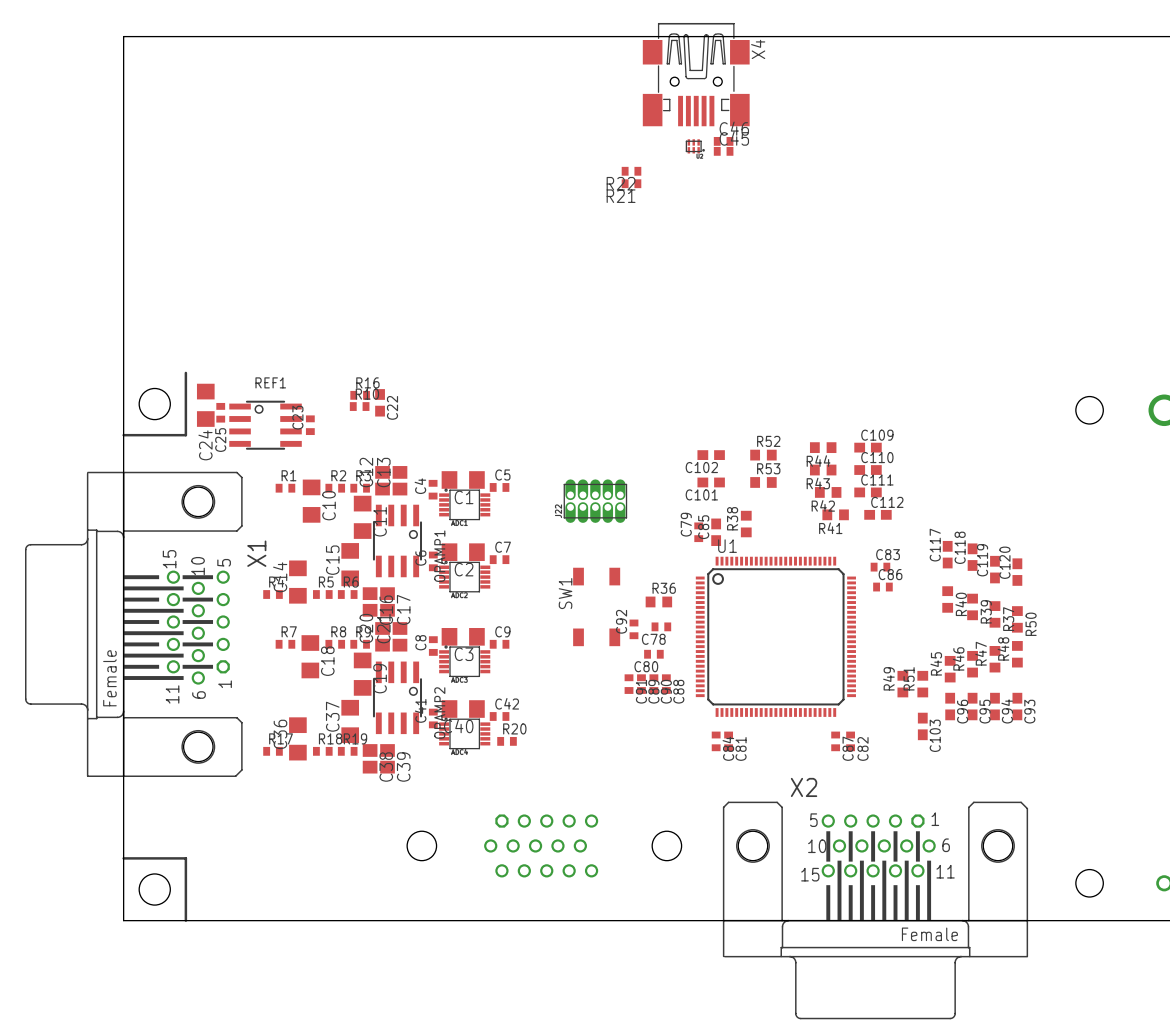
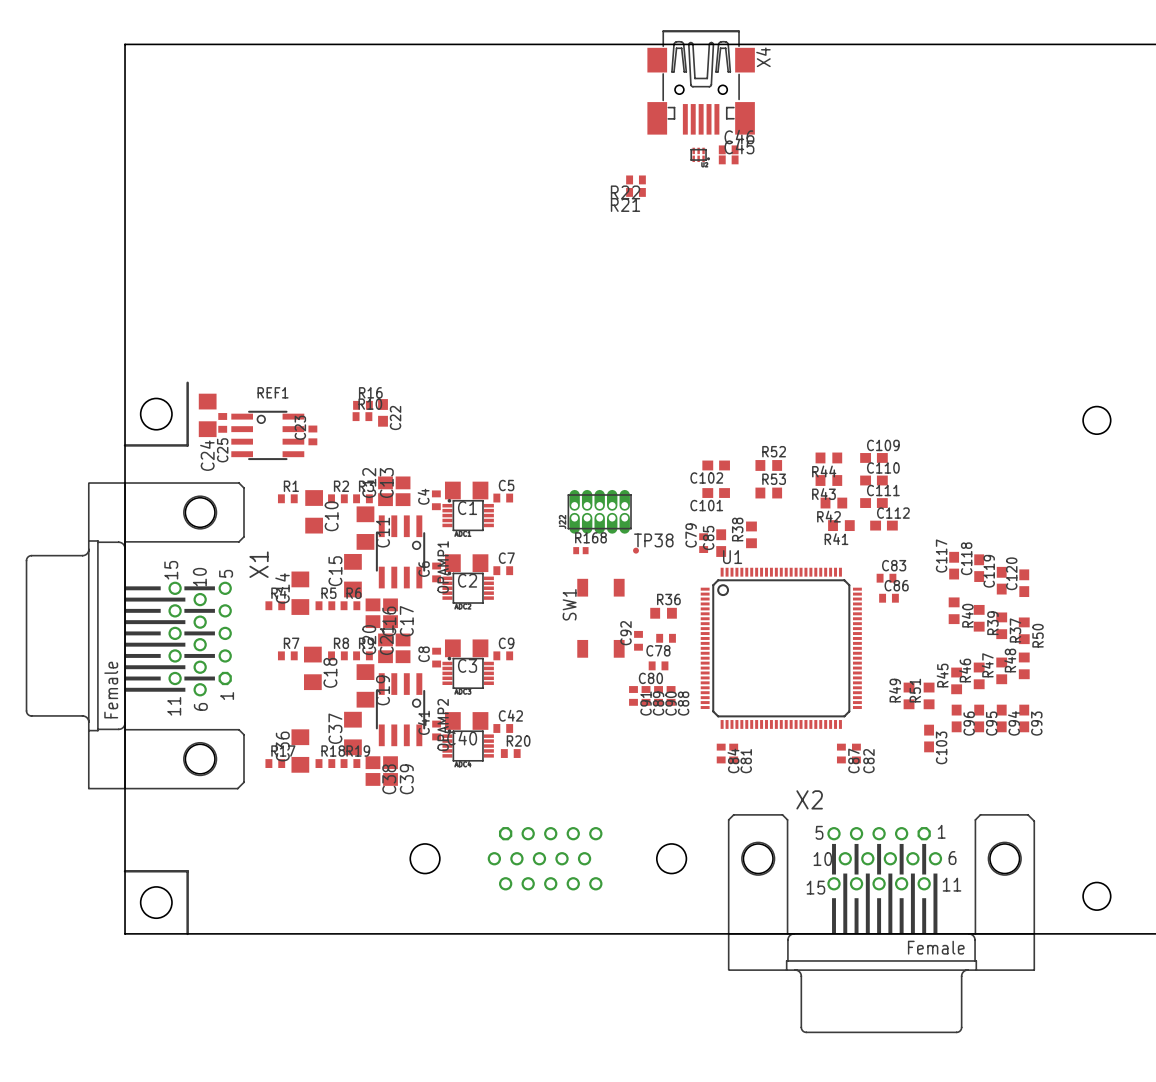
R168: none -> (580, 550)
TP38: none -> (636, 550)

